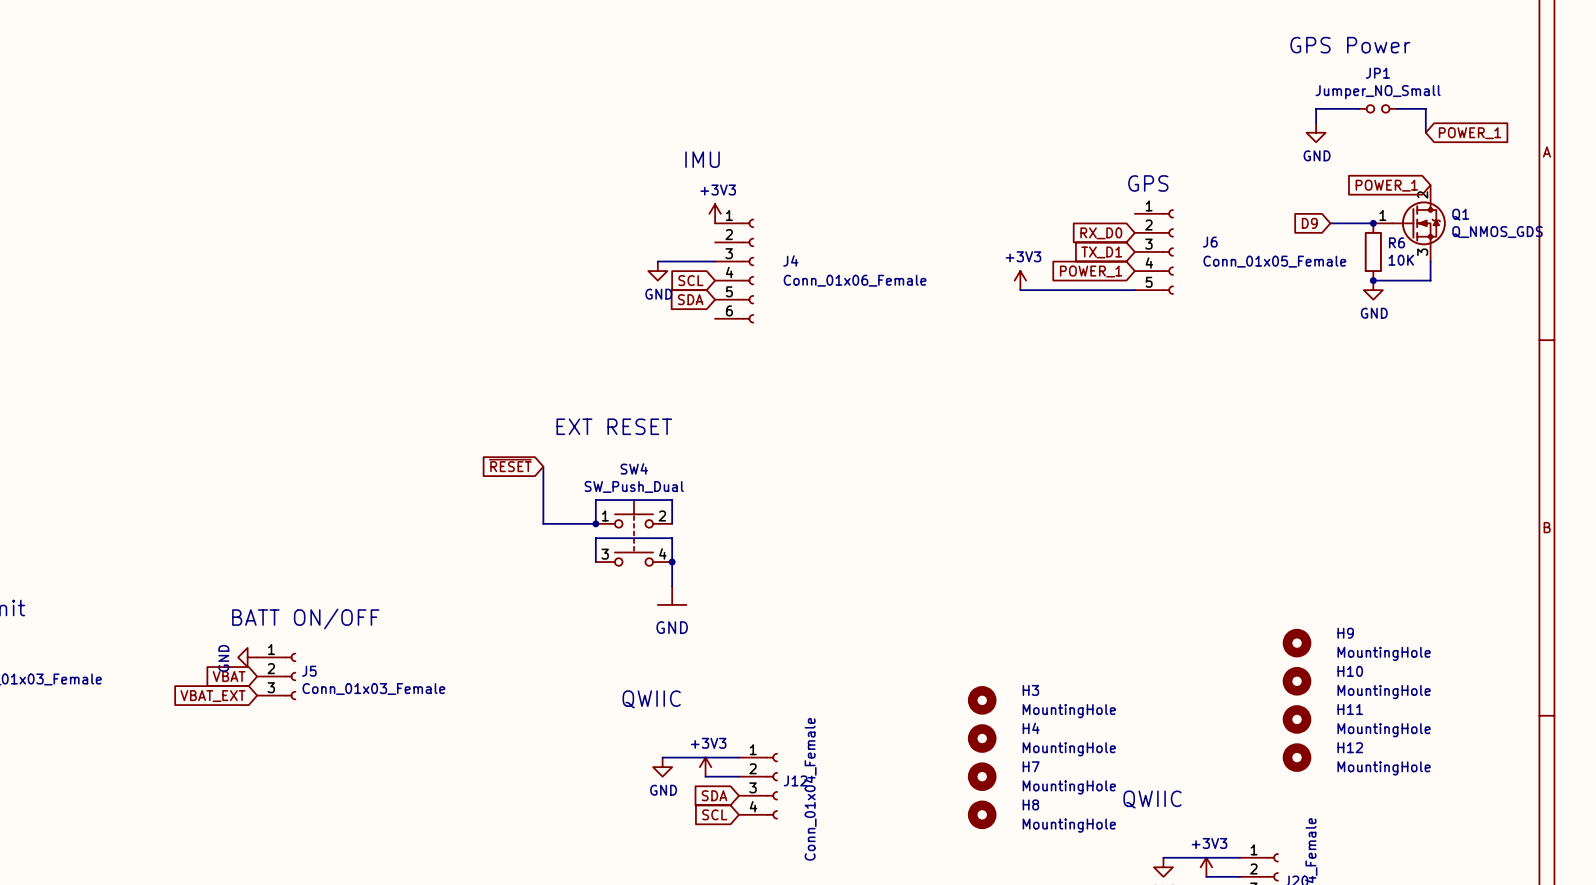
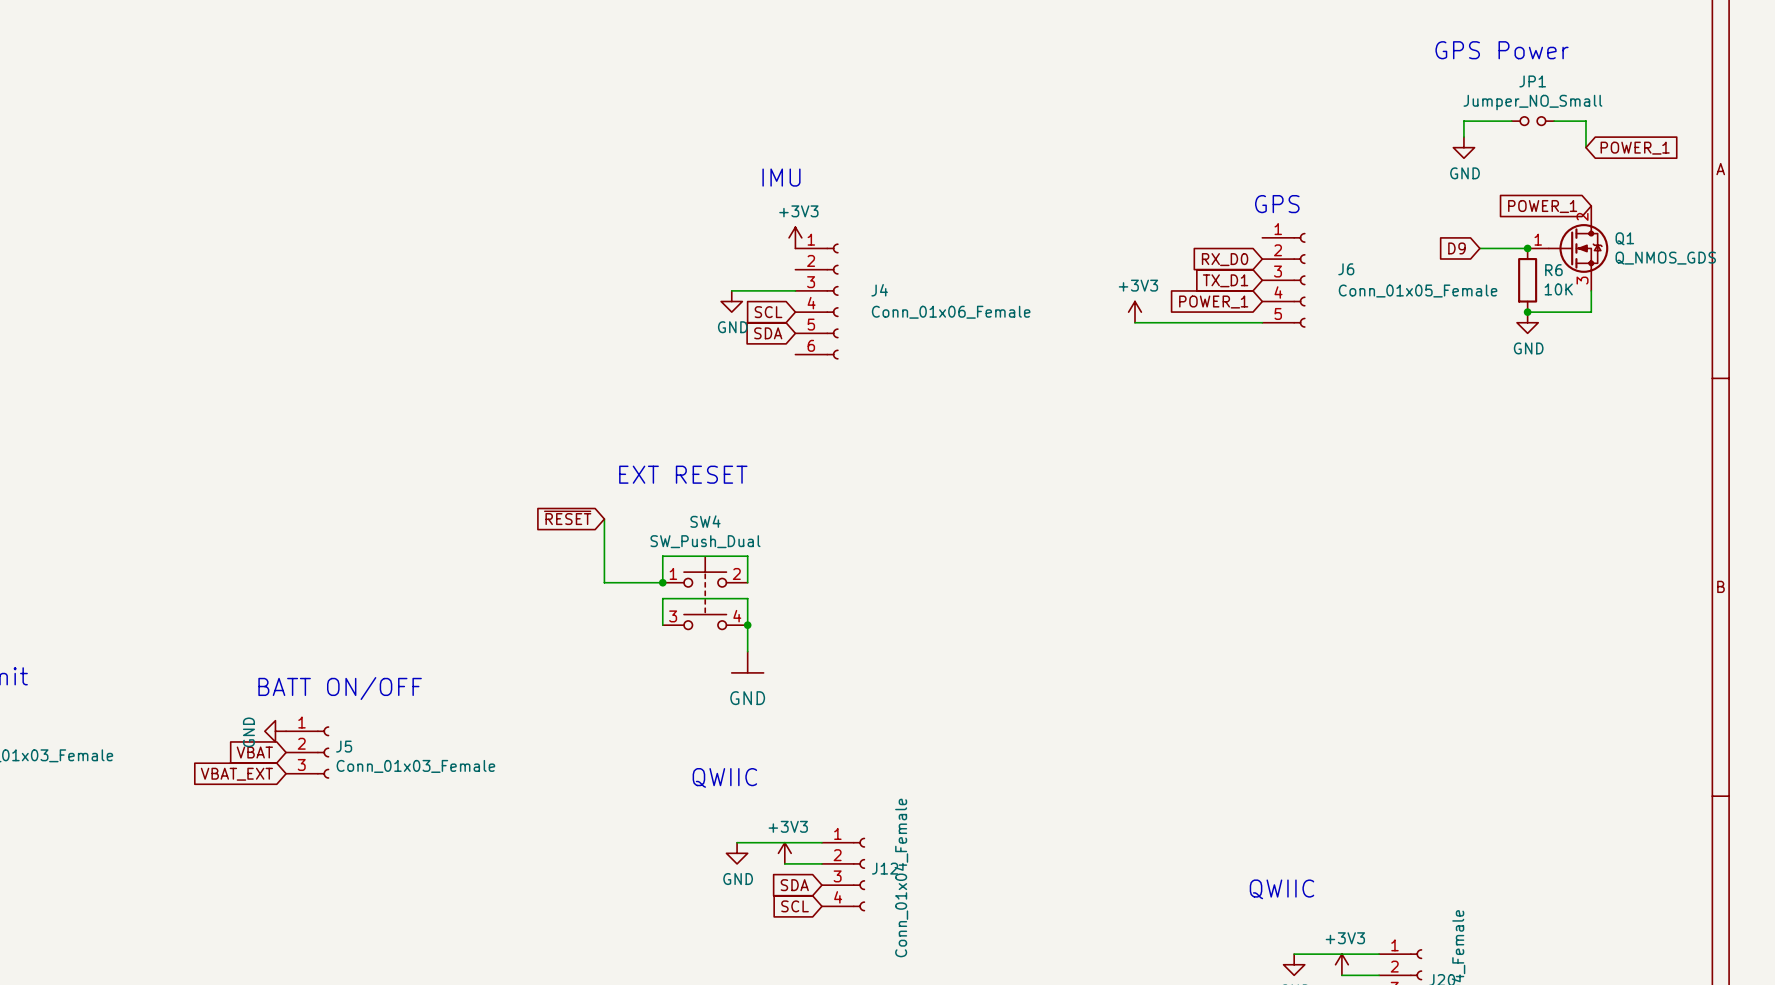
H9: MountingHole (1297, 643) -> none
H10: MountingHole (1297, 681) -> none
H3: MountingHole (982, 700) -> none
H11: MountingHole (1297, 719) -> none
H4: MountingHole (982, 738) -> none
H12: MountingHole (1297, 757) -> none
H7: MountingHole (982, 776) -> none
H8: MountingHole (982, 814) -> none

